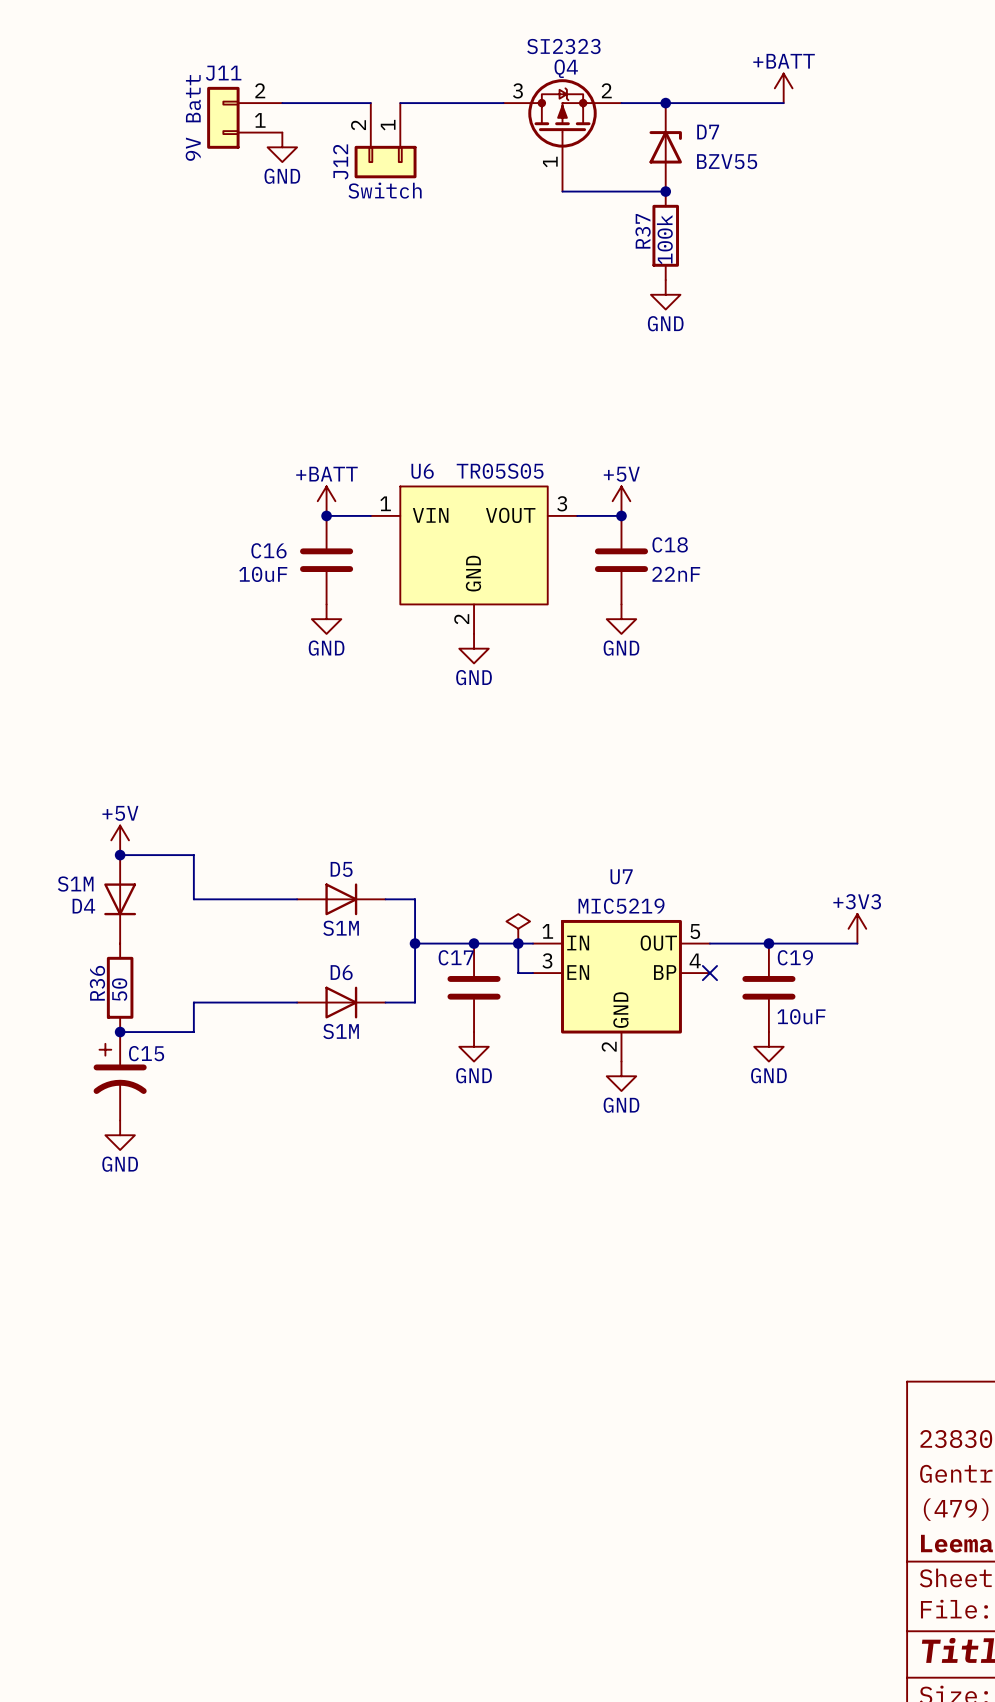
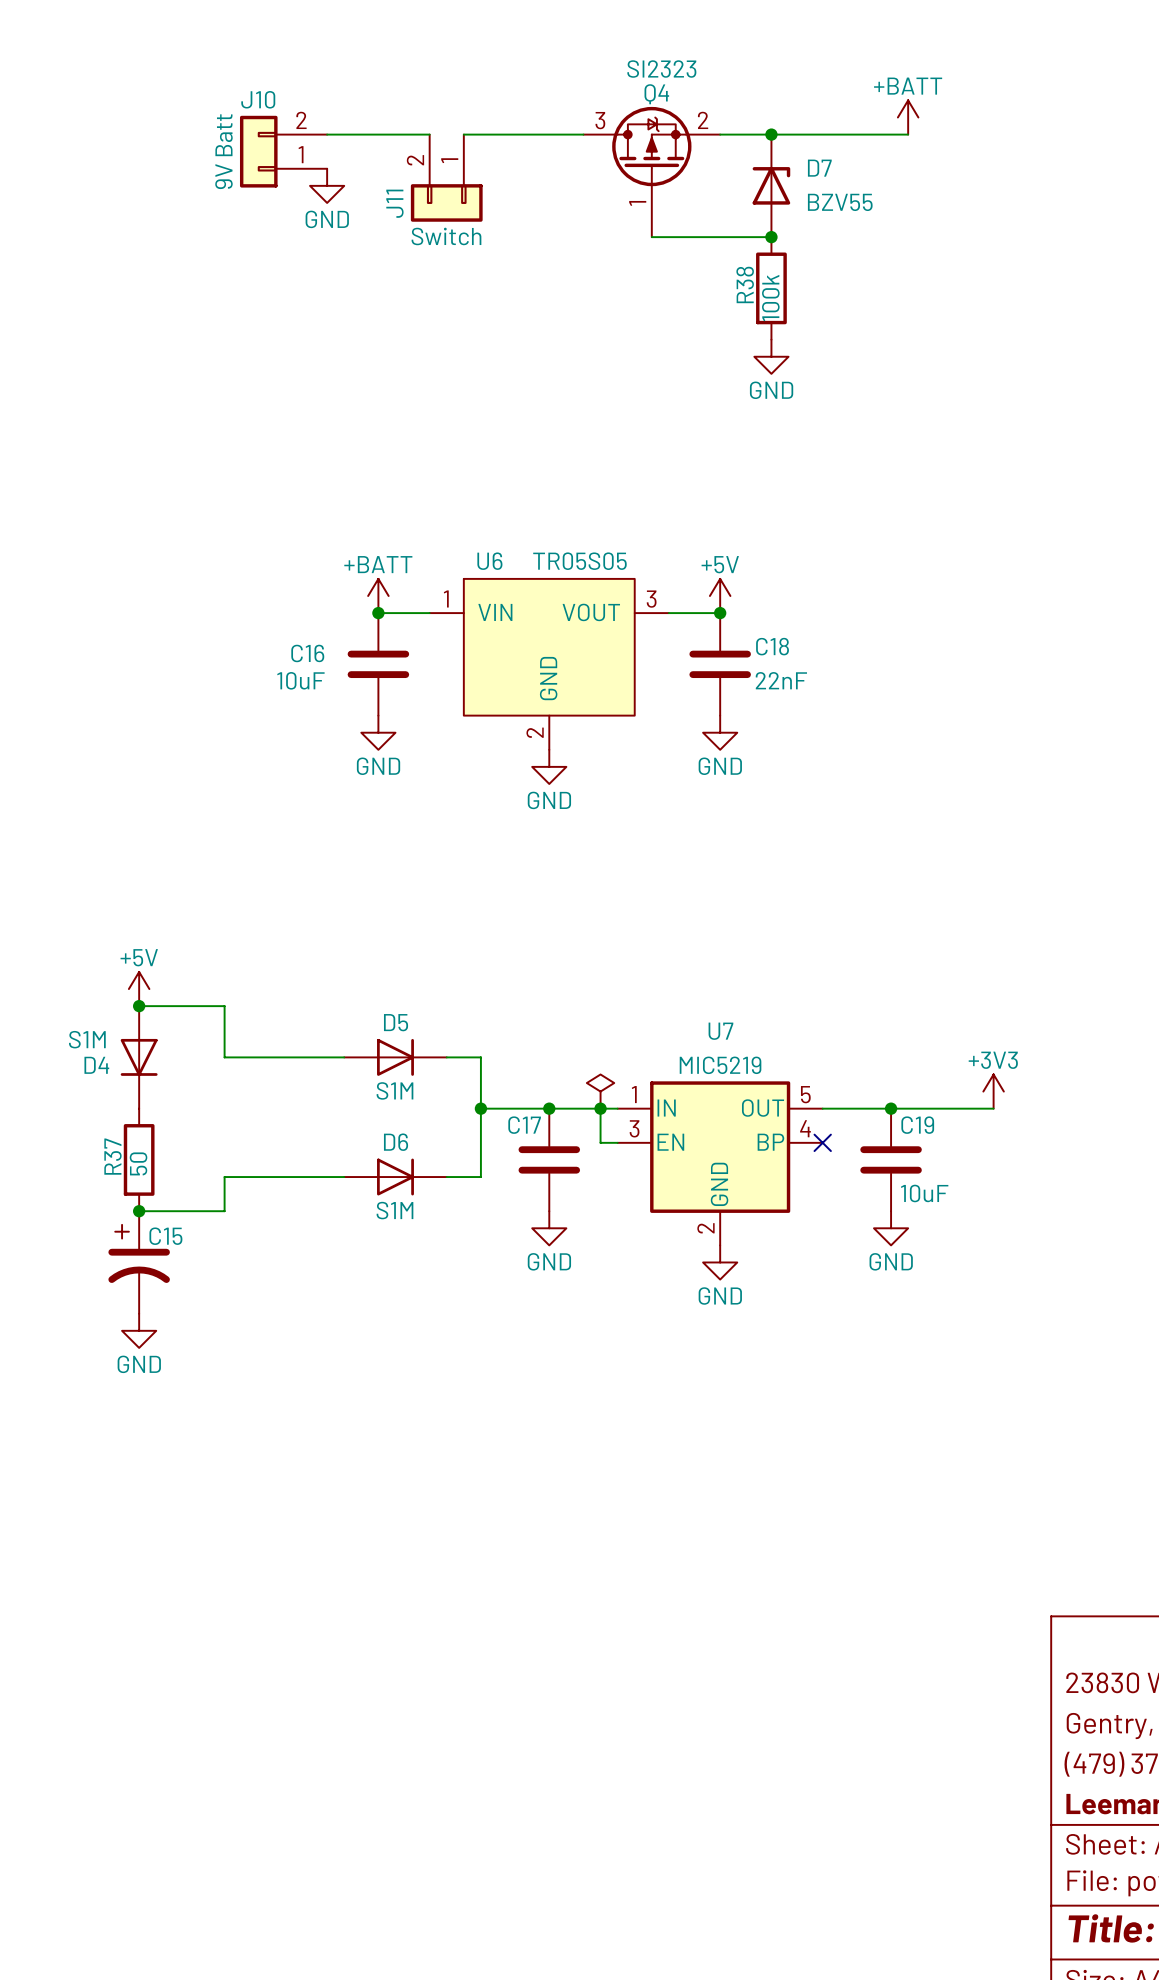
J11 name: J11 (223, 73) -> J10 (258, 99)
J12 name: J12 (340, 161) -> J11 (394, 203)
R37 name: R37 (643, 231) -> R38 (745, 284)
R36 name: R36 (97, 983) -> R37 (112, 1156)

